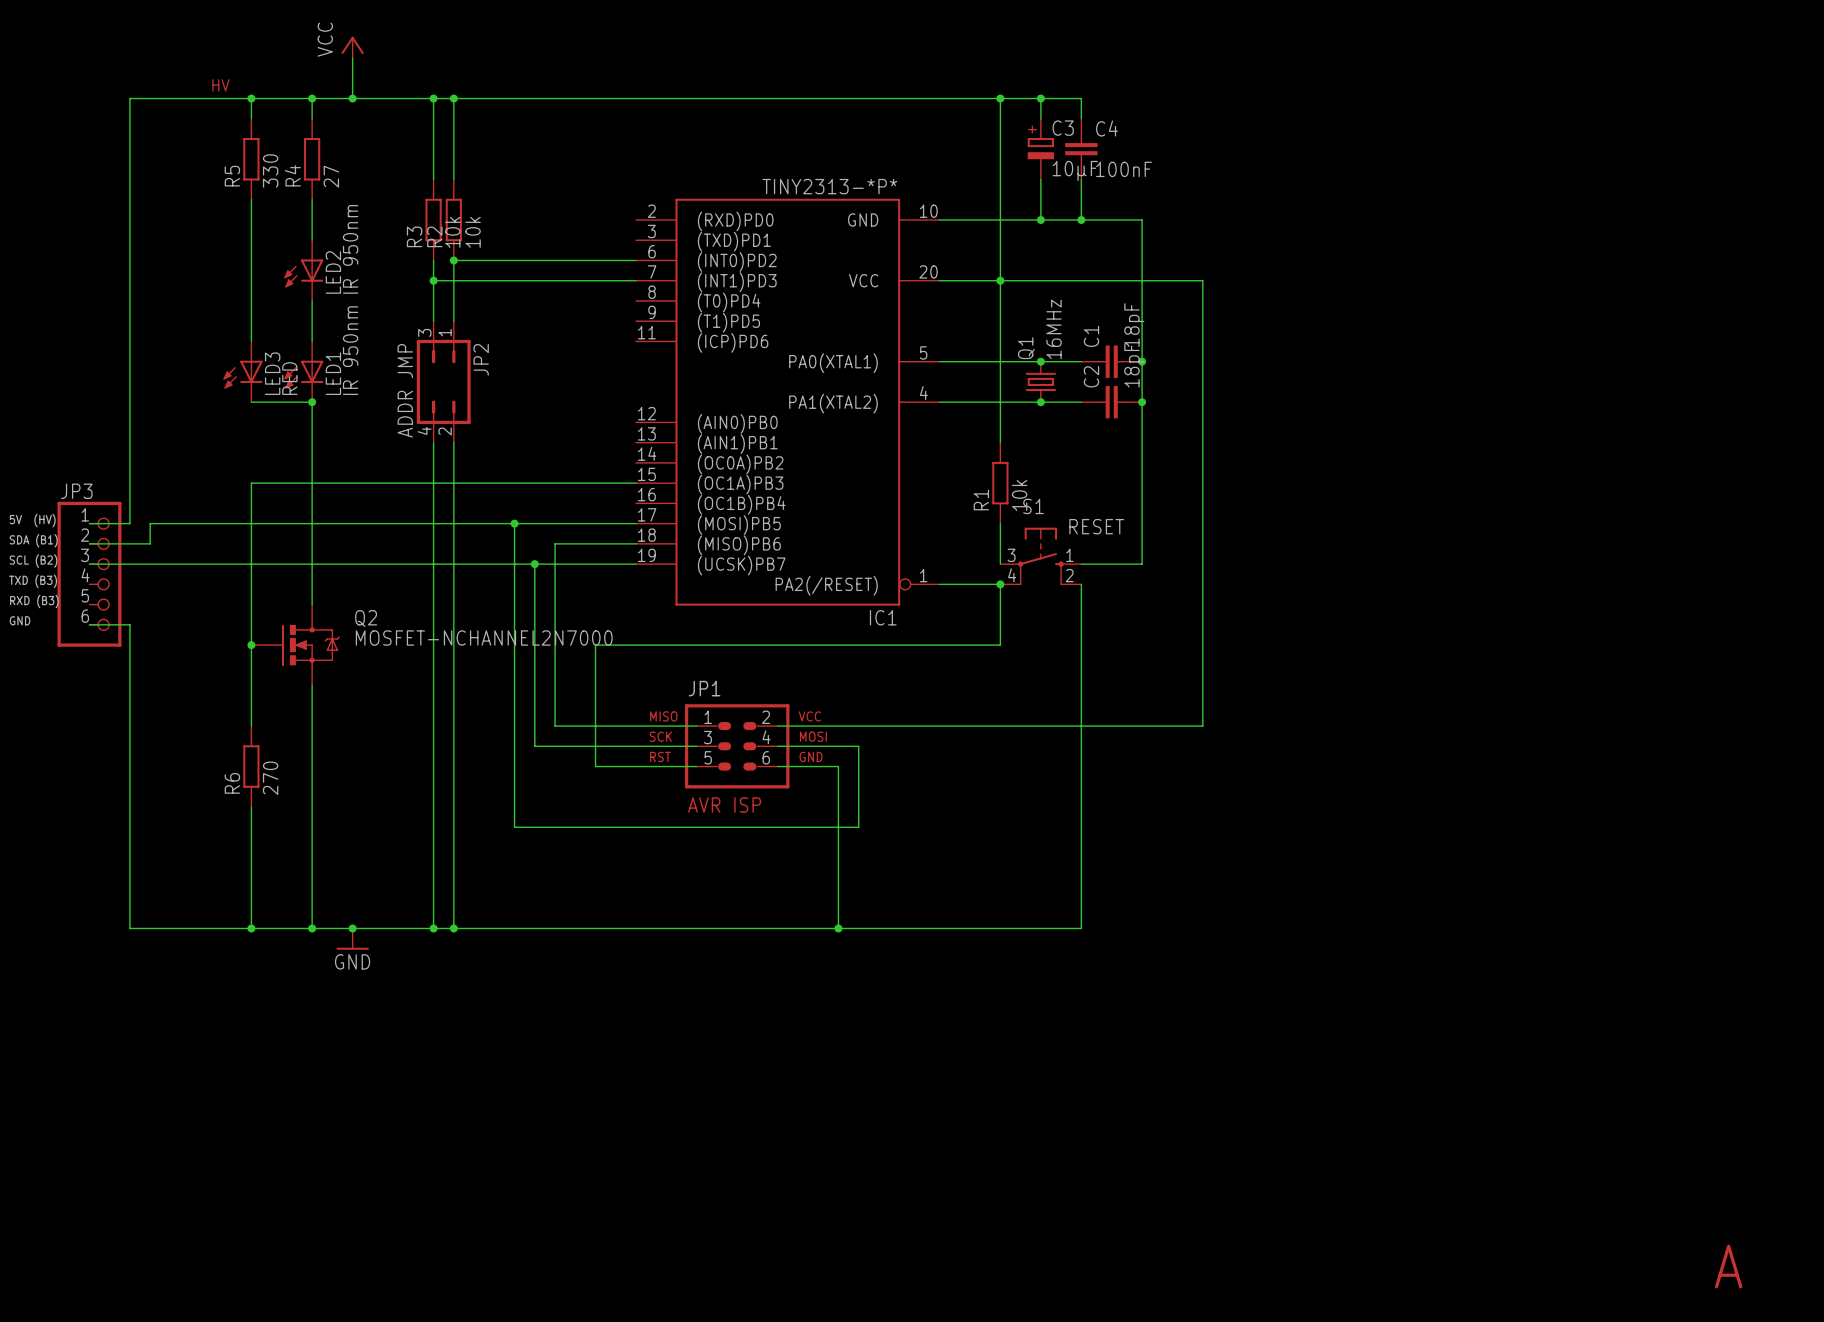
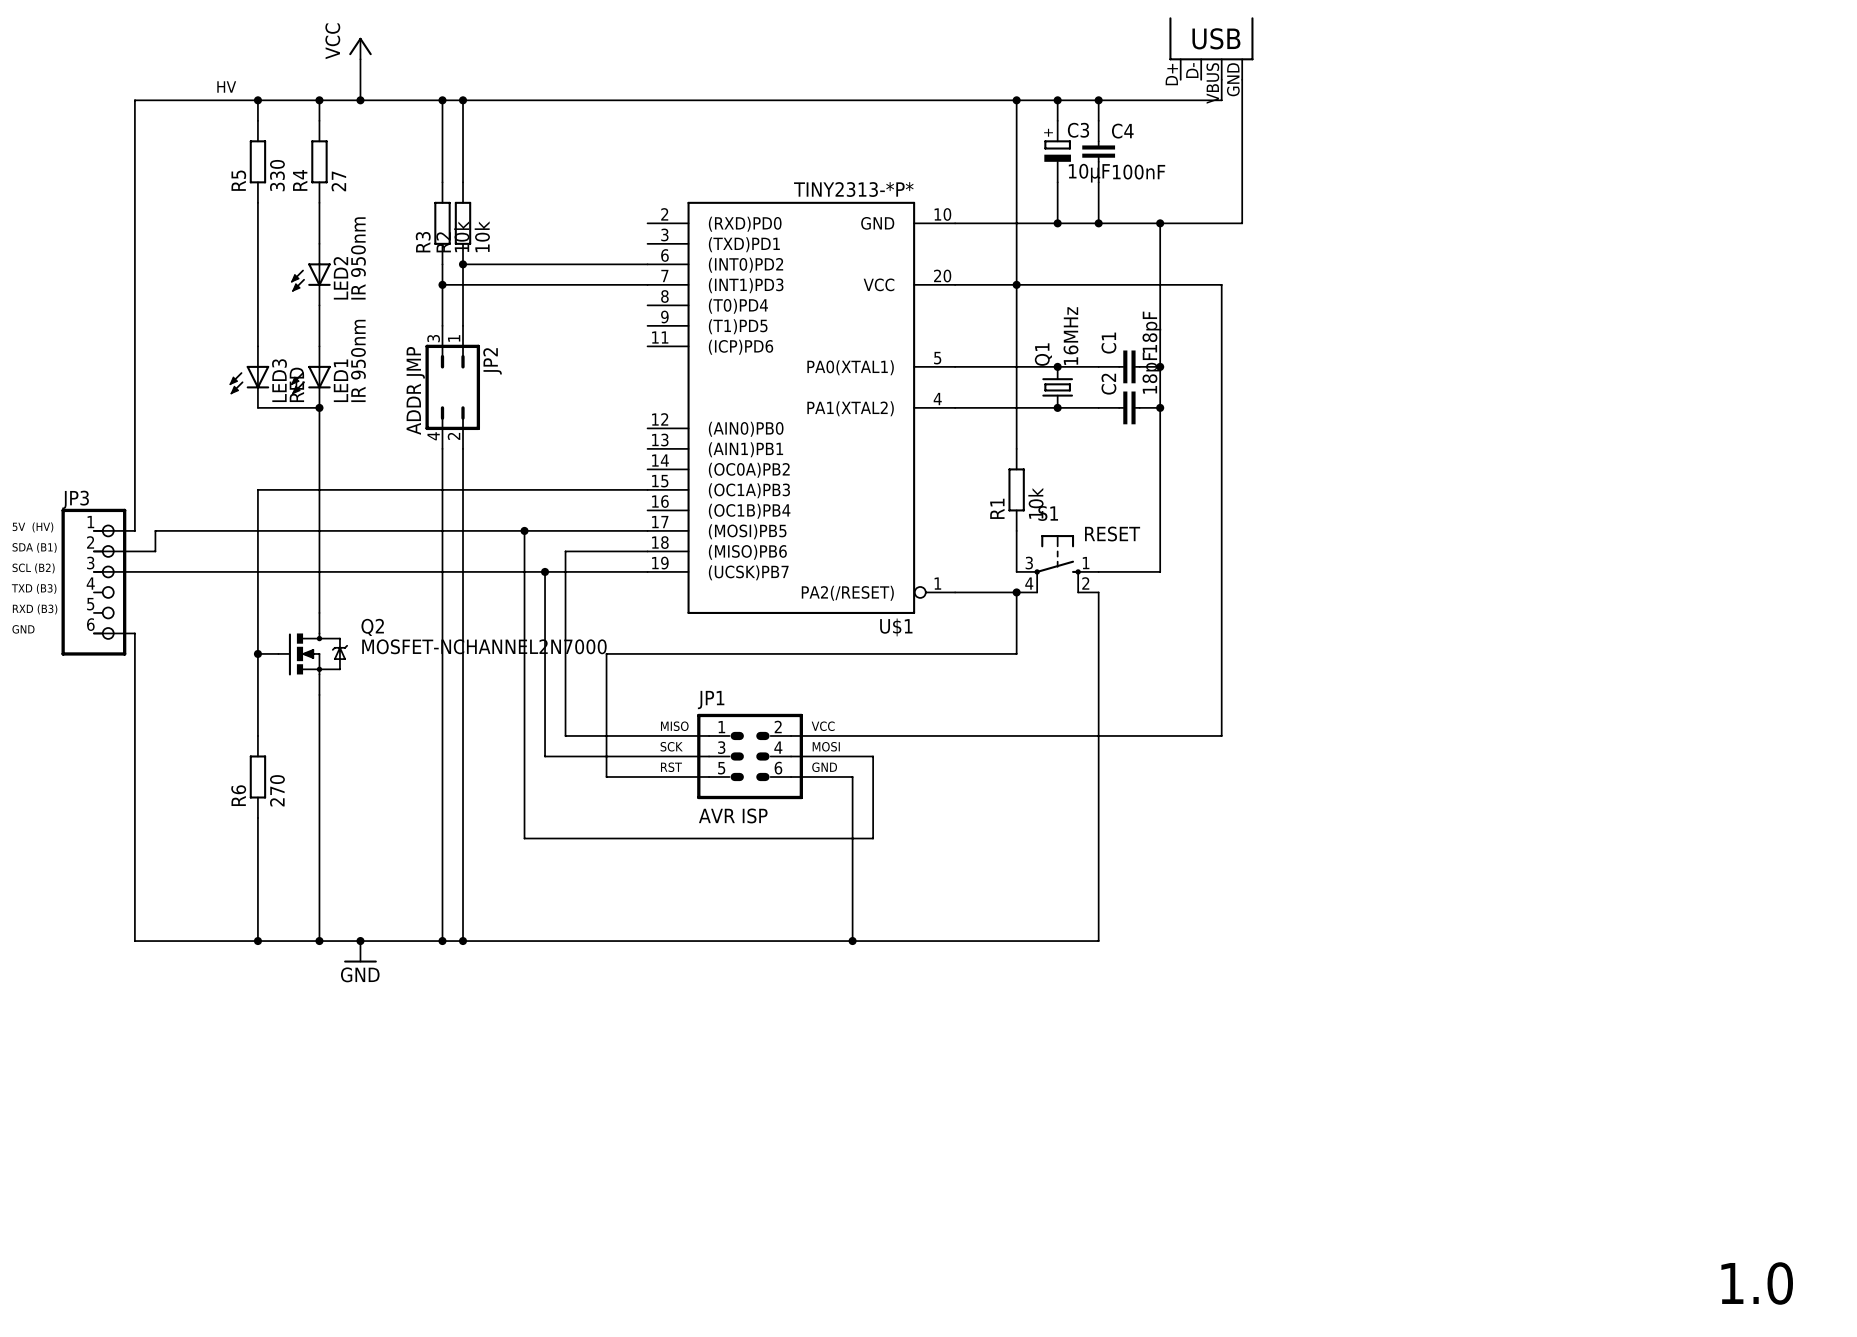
part: none -> (1211, 48)
wire: none -> (1221, 79) (1221, 100) (1098, 100)
wire: none -> (1242, 79) (1242, 223) (1160, 223)
junction: none -> (1098, 100)
junction: none -> (1160, 223)
IC1 name: IC1 (883, 617) -> U$1 (896, 627)
text: A (1728, 1266) -> none
text: none -> 1.0 (1757, 1283)

